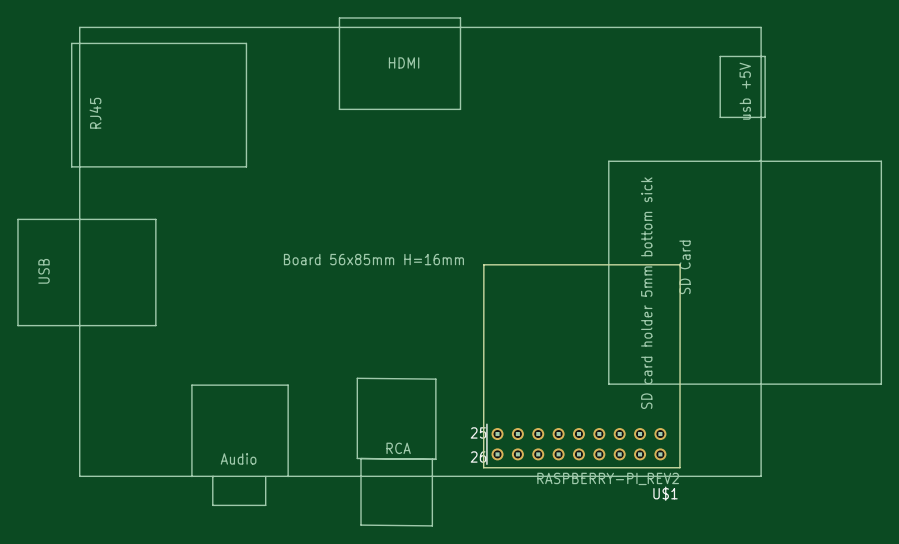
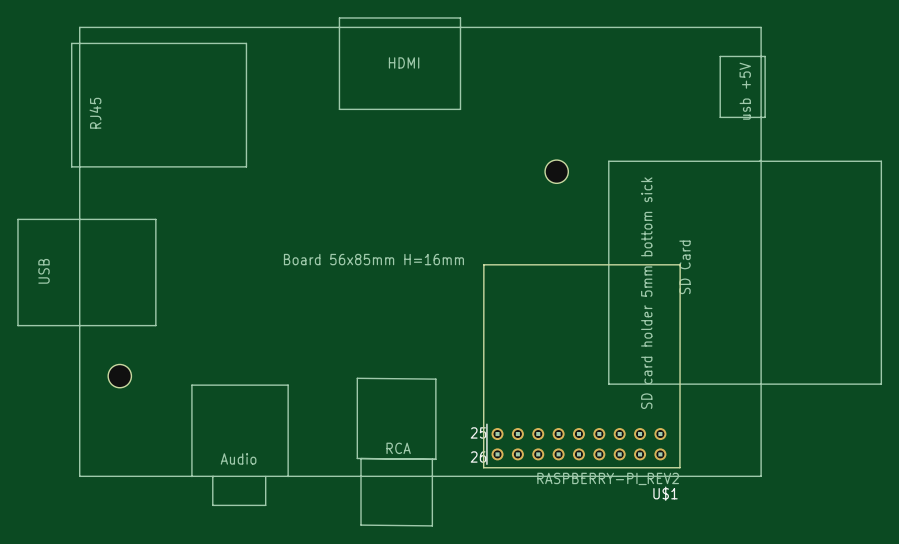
U$1 footprint: [17, 17, 882, 527] -> [17, 17, 882, 527]

